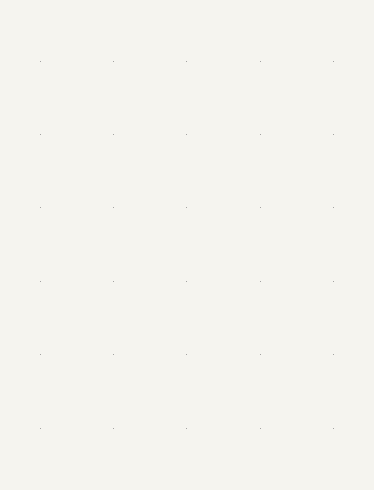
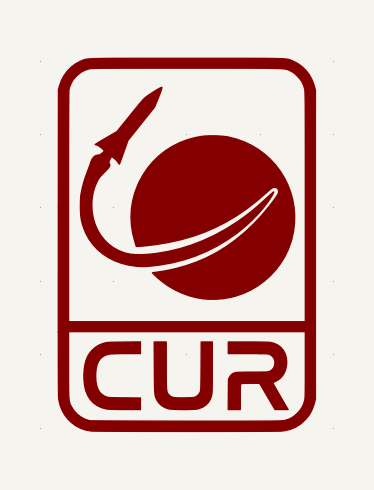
power symbol: none -> (186, 244)

